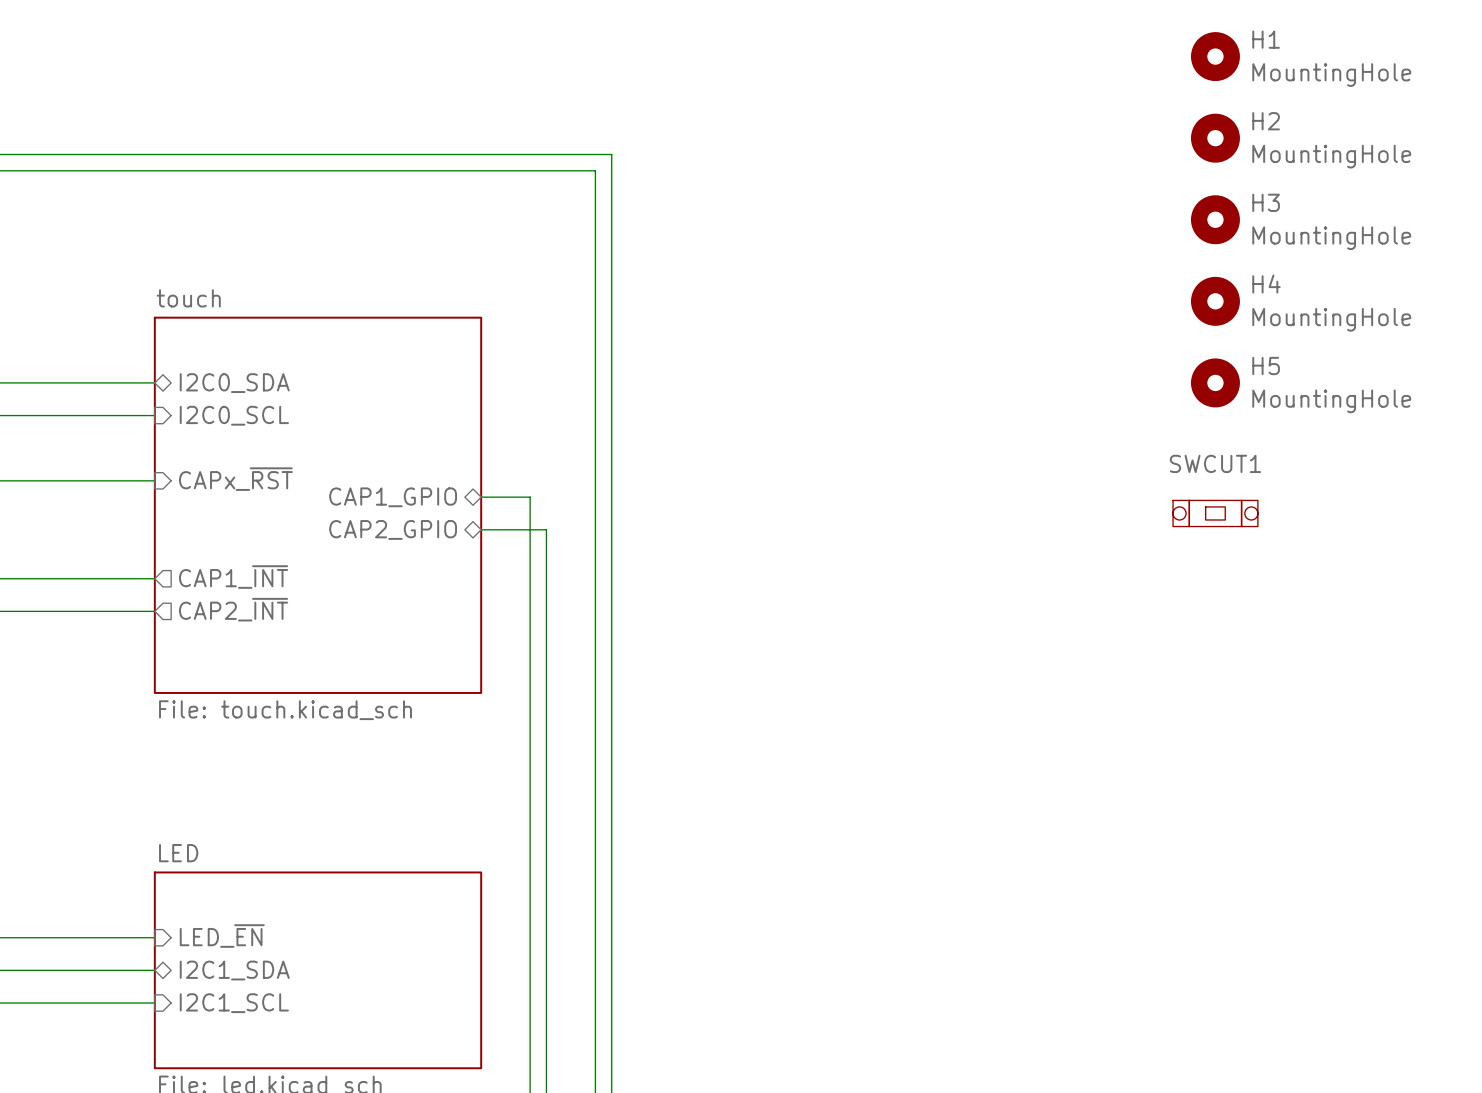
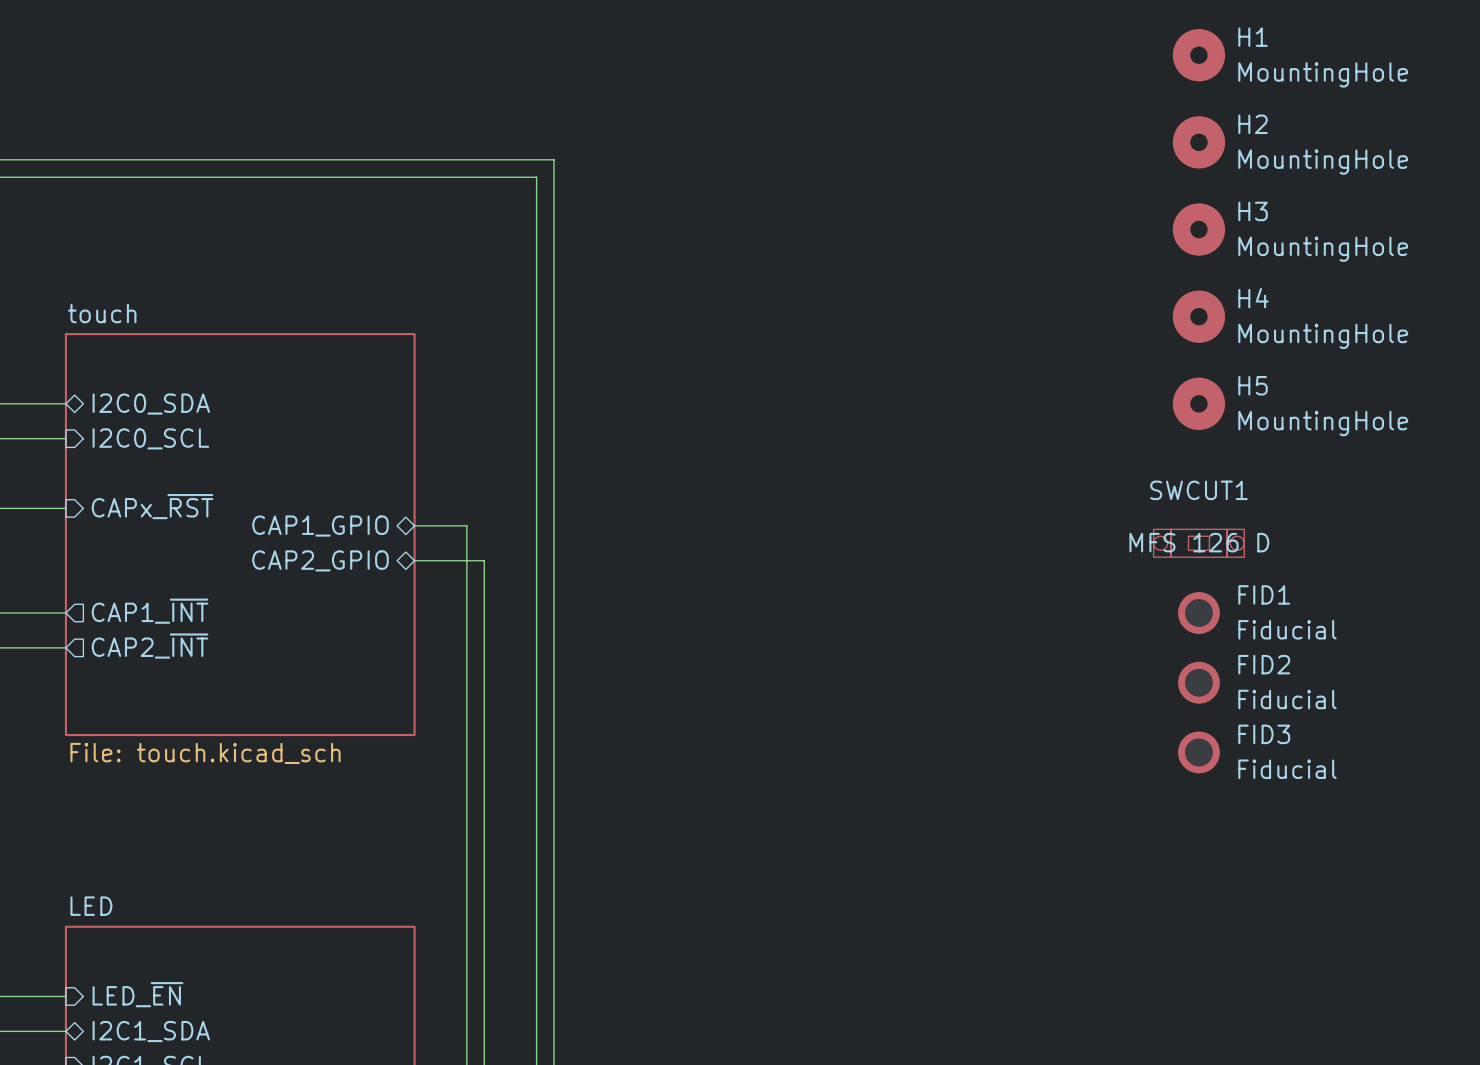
SWCUT1 value: none -> MFS 126 D (1199, 542)
FID1: none -> Fiducial (1198, 613)
FID2: none -> Fiducial (1198, 682)
FID3: none -> Fiducial (1198, 752)

